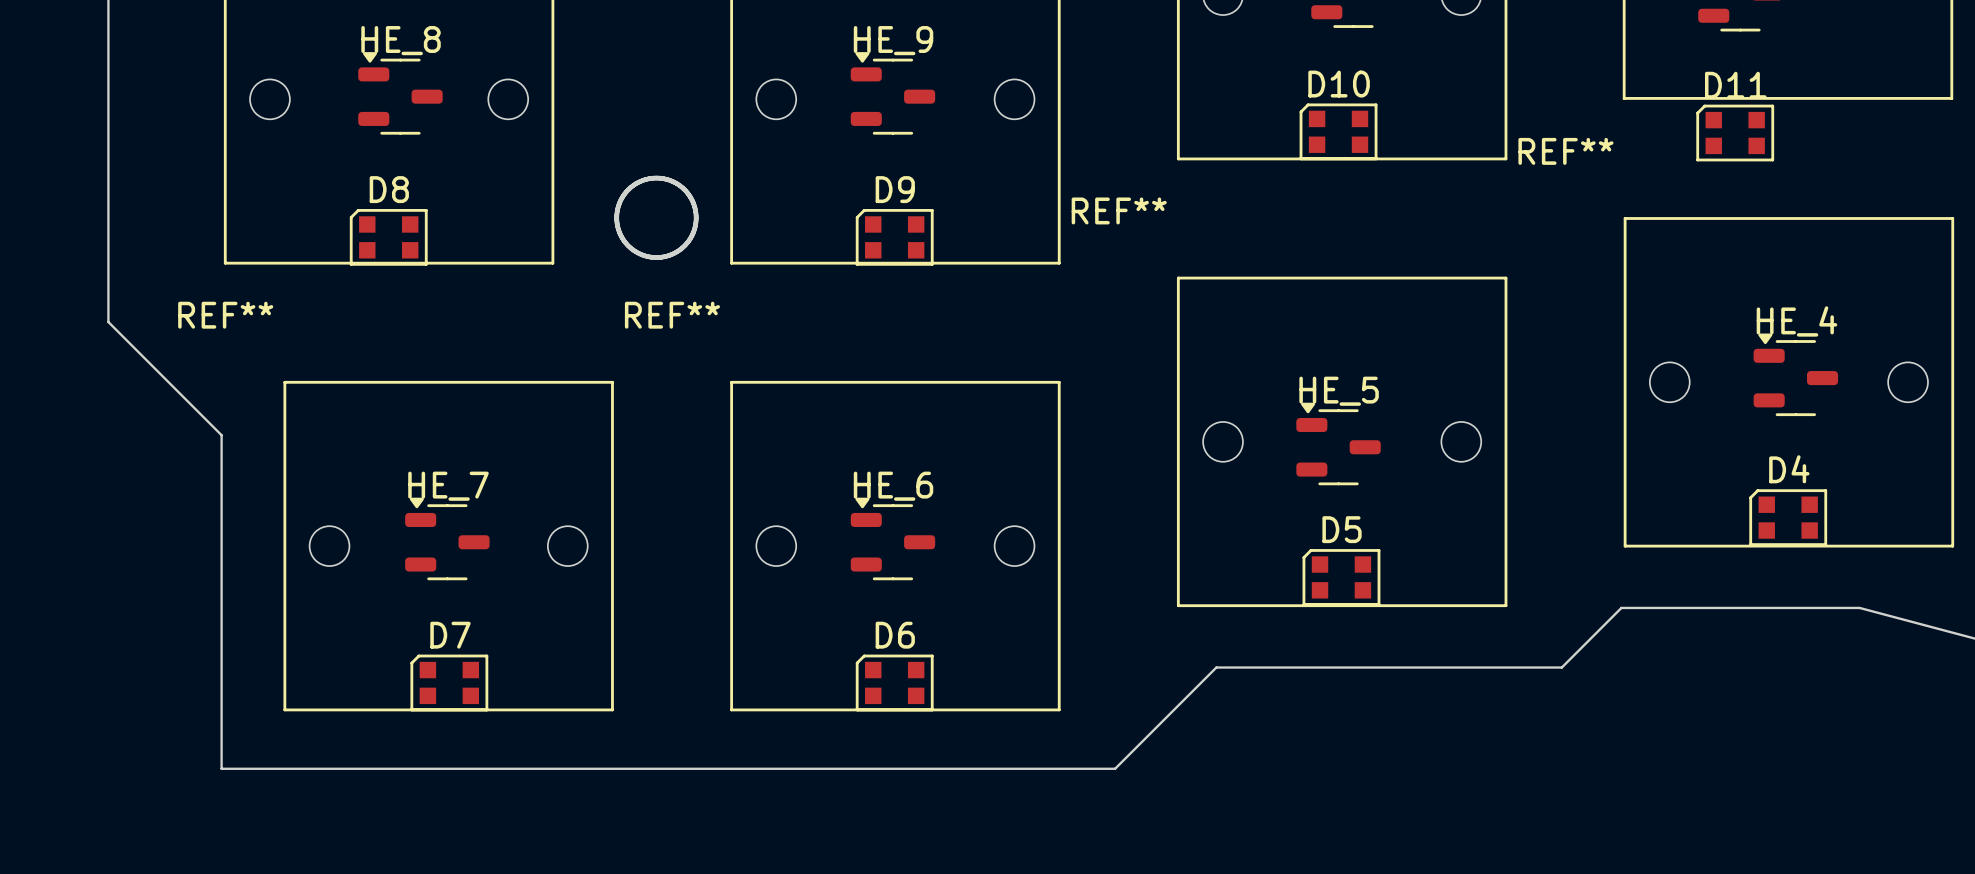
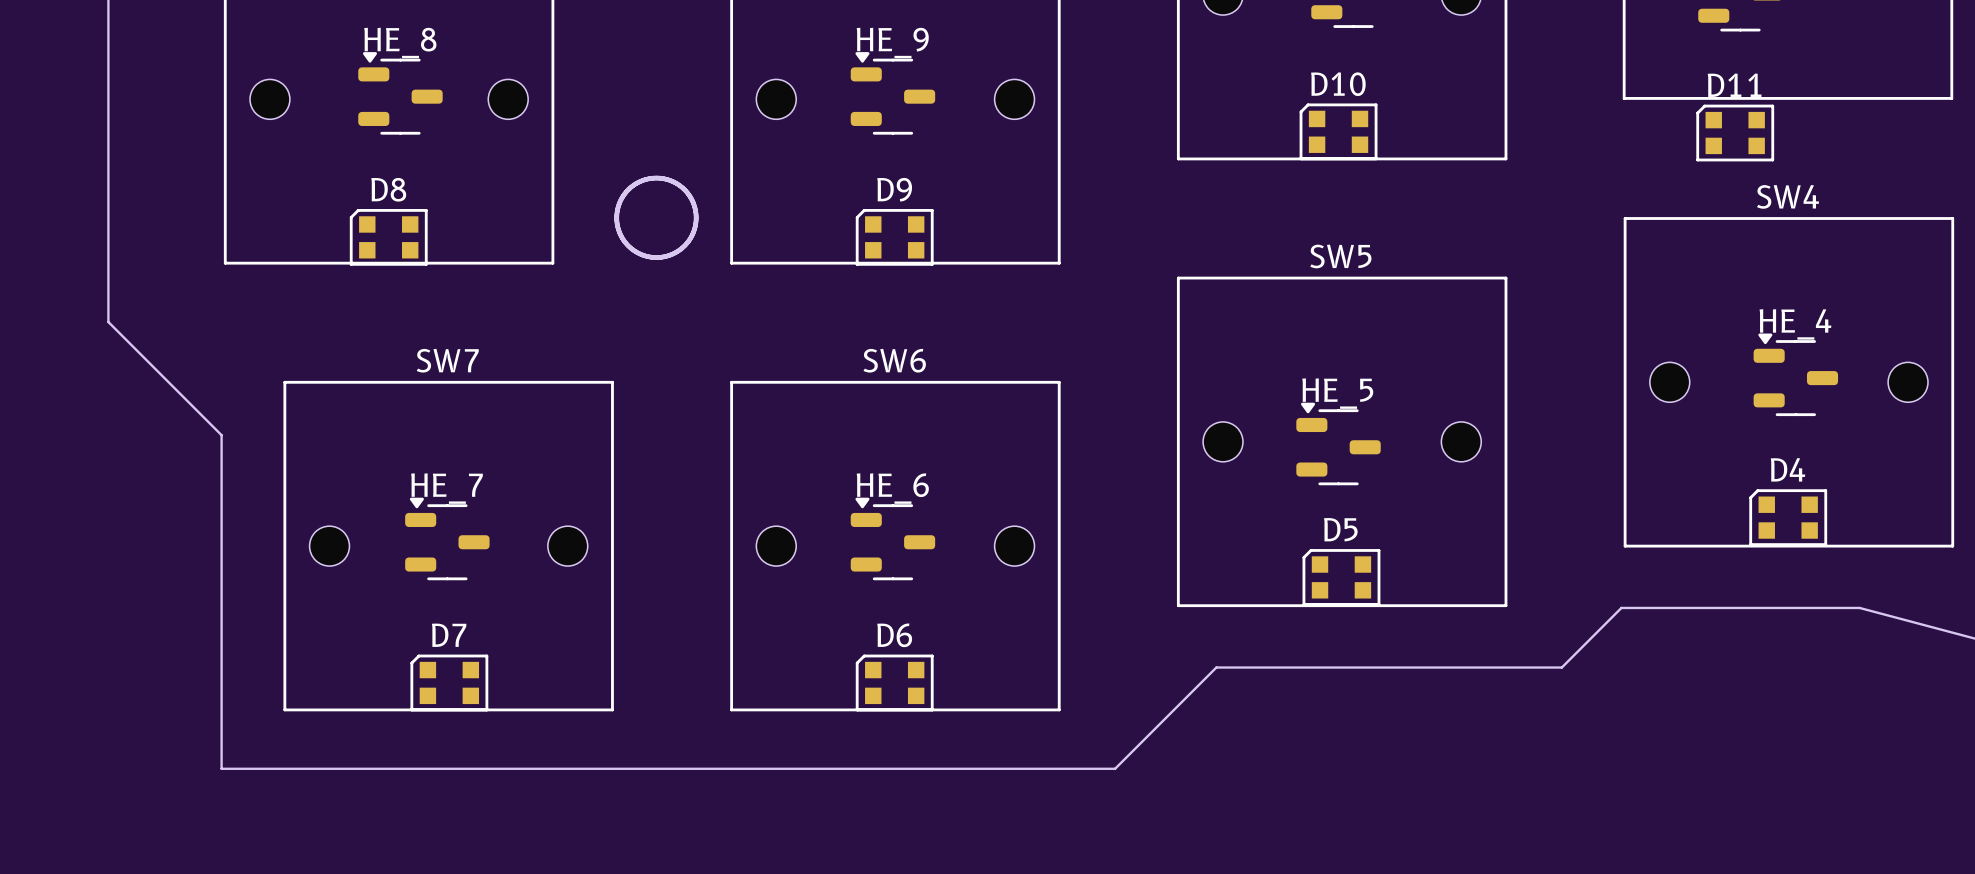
REF** name: REF** (1565, 151) -> SW4 (1788, 196)
REF** name: REF** (1119, 210) -> SW5 (1340, 256)
REF** name: REF** (225, 315) -> SW7 (447, 360)
REF** name: REF** (672, 315) -> SW6 (894, 360)

